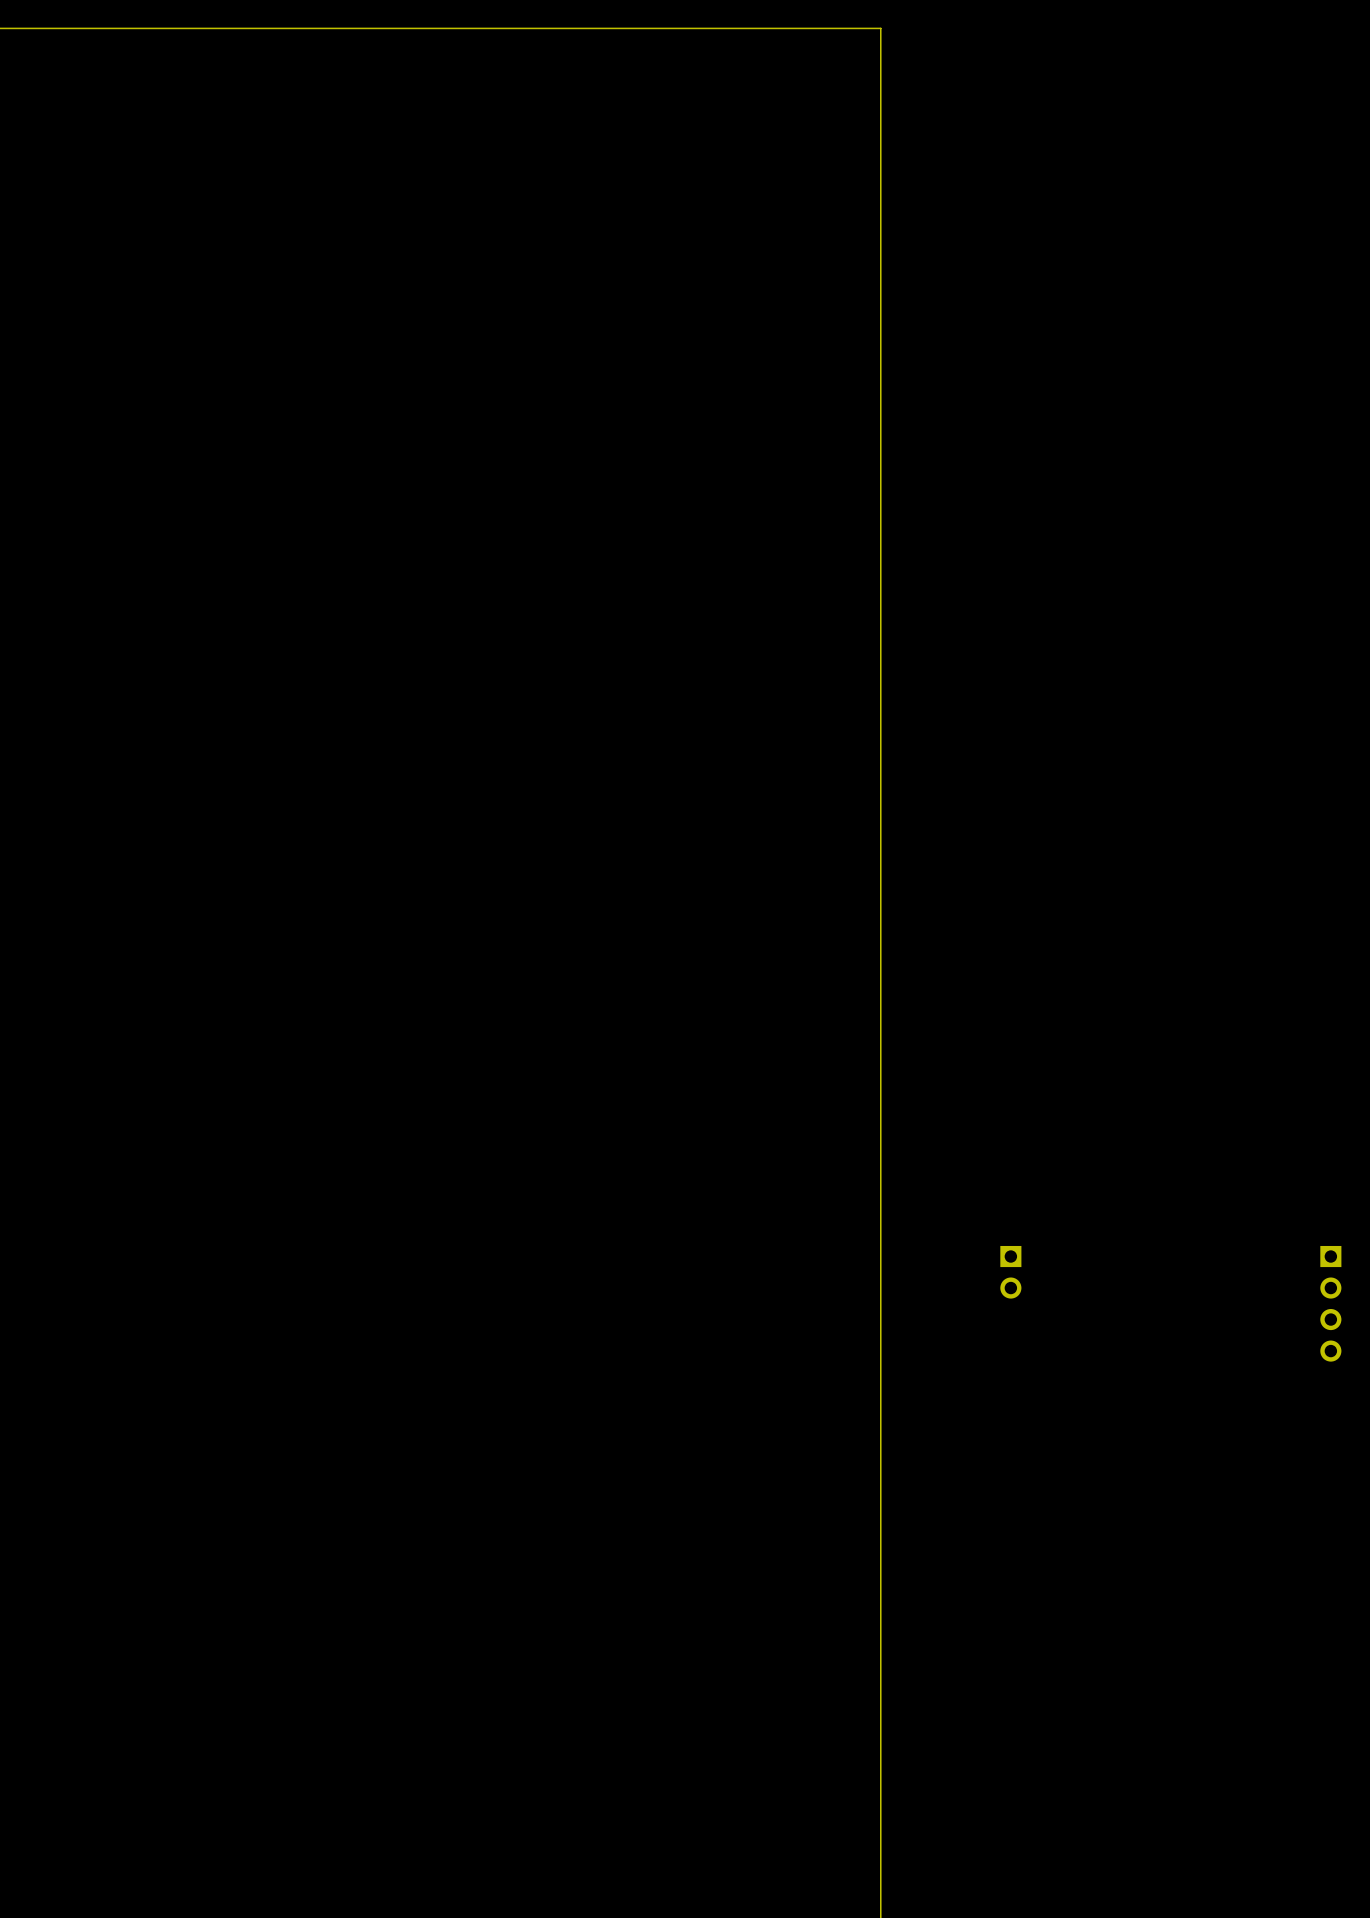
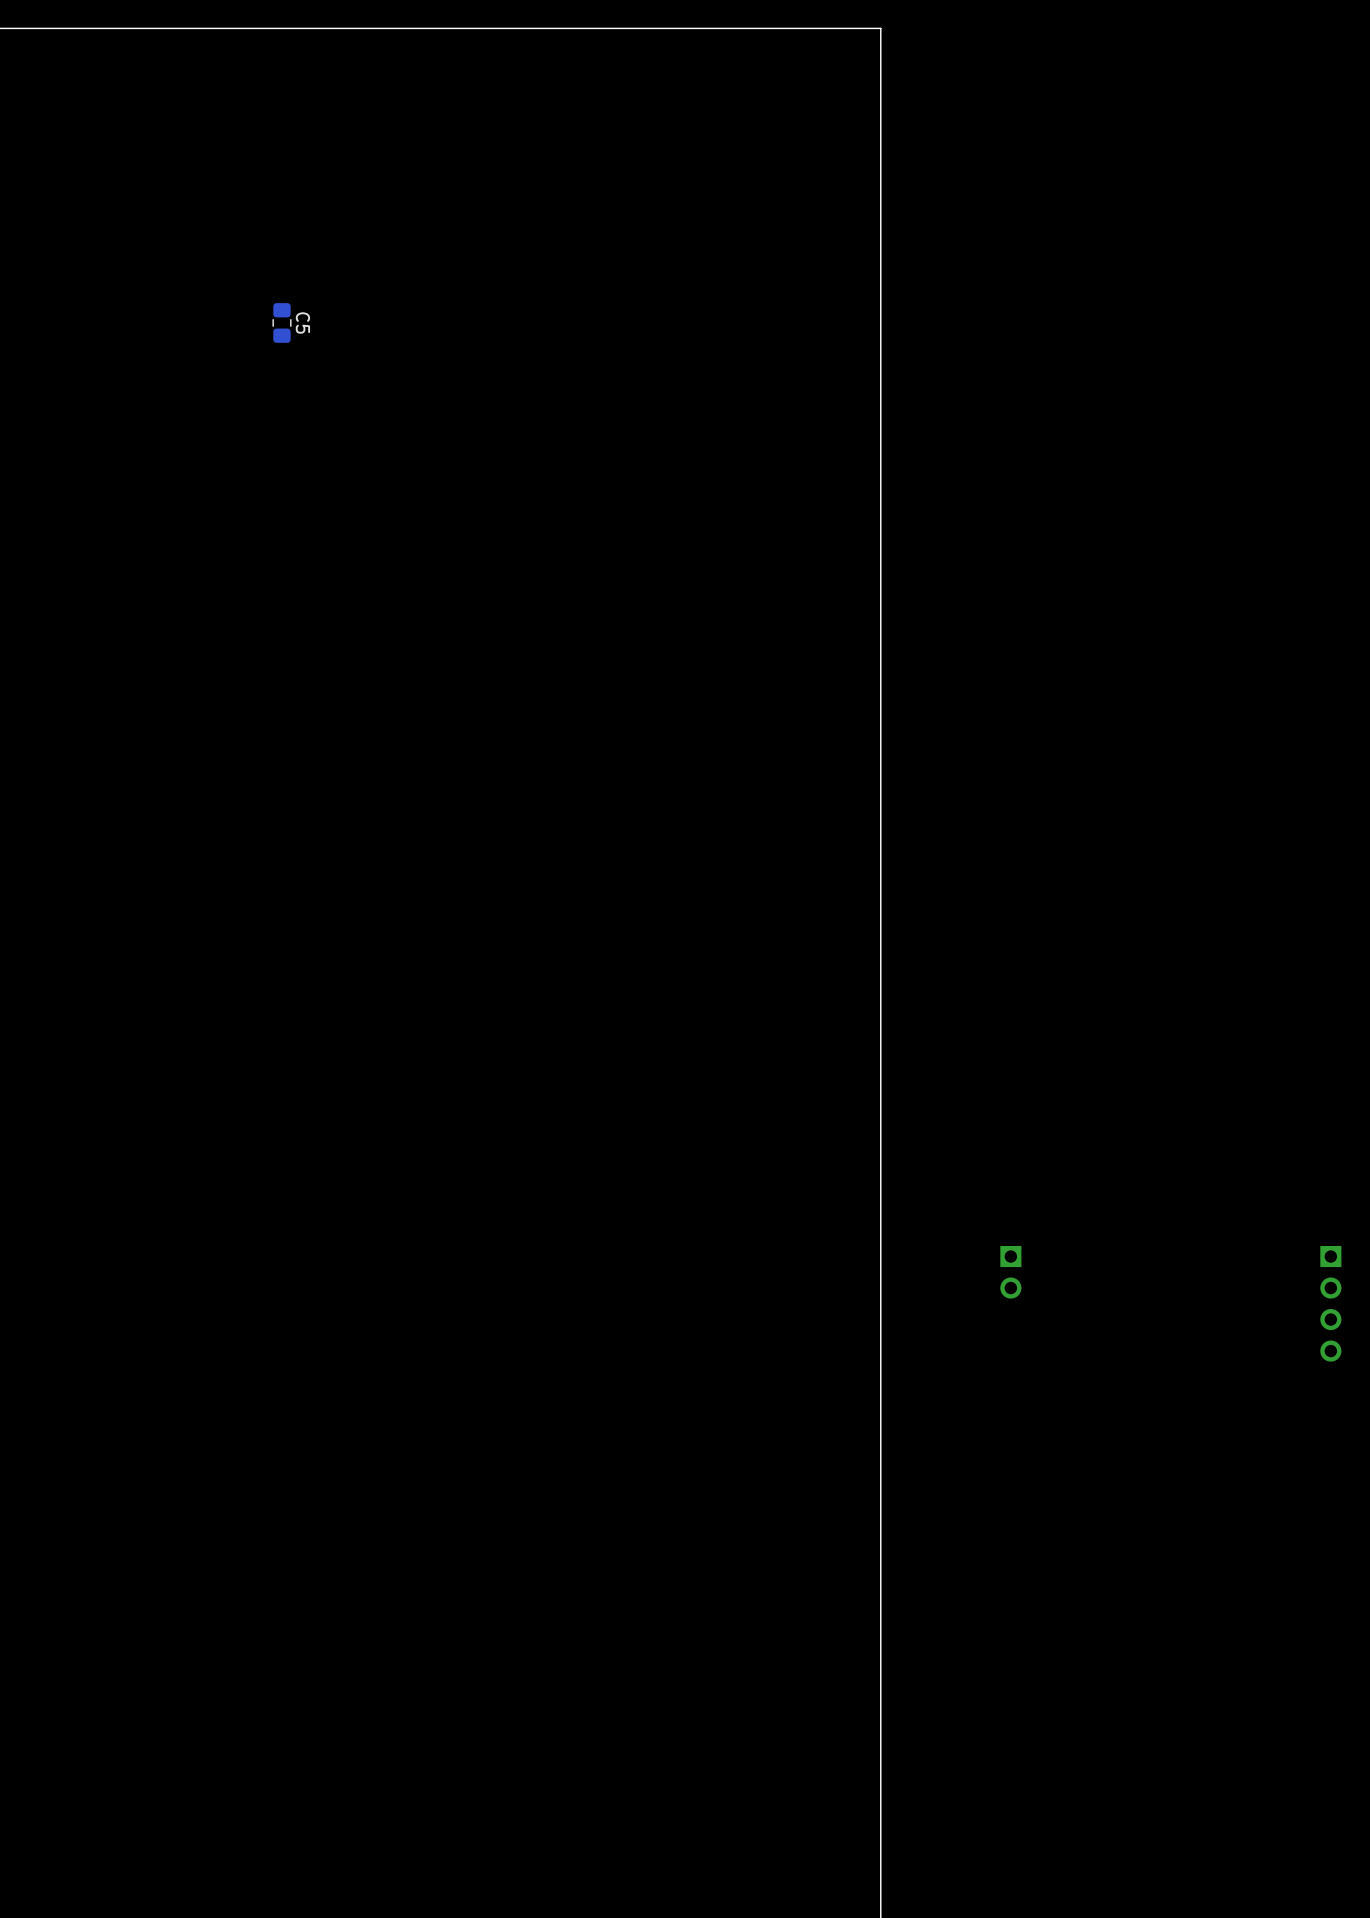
C5: none -> (281, 322)

